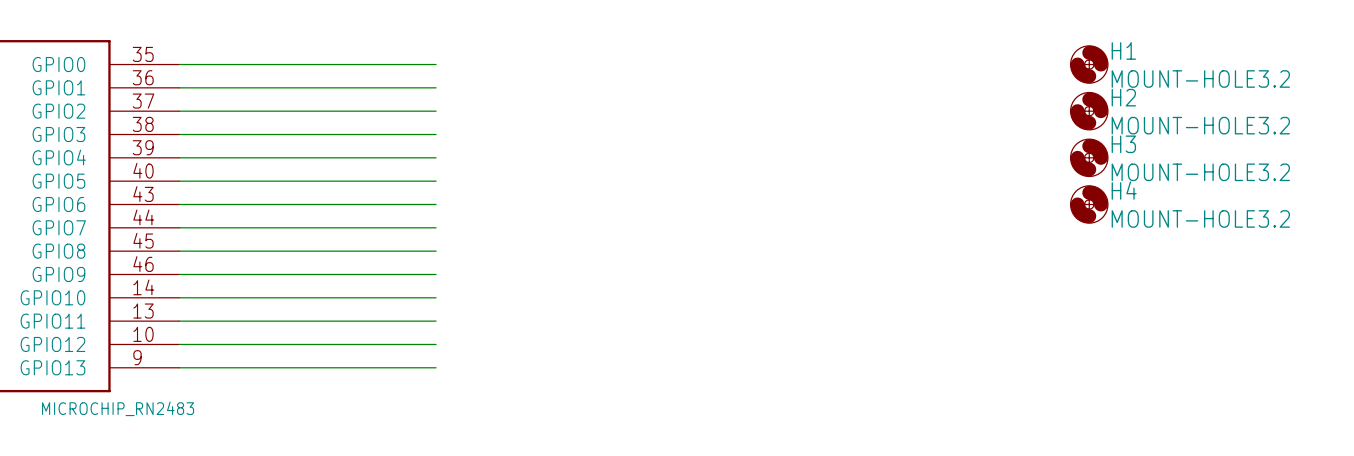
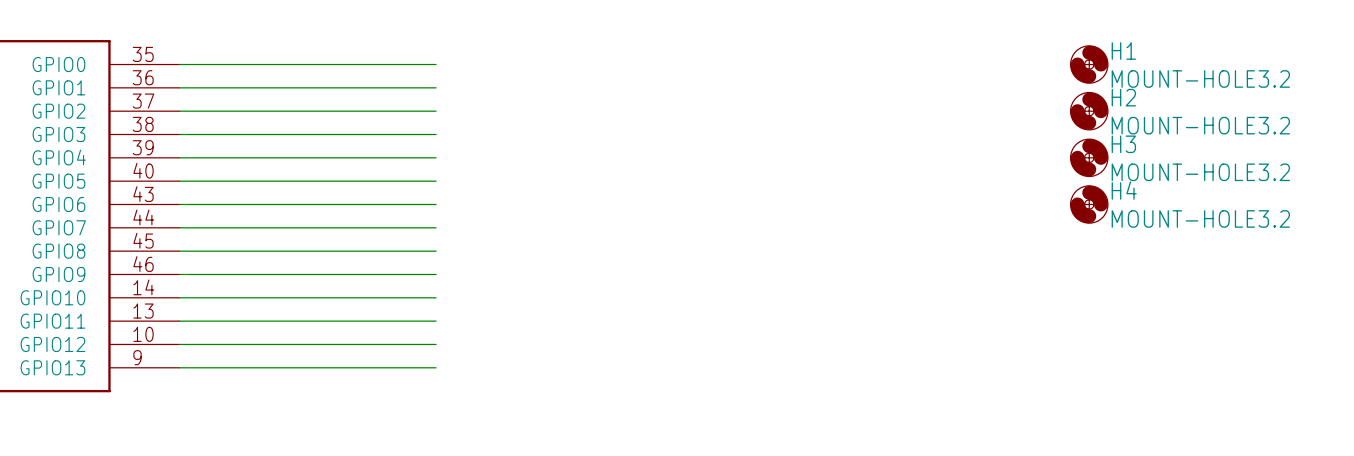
part value: MICROCHIP_RN2483 (118, 408) -> none

